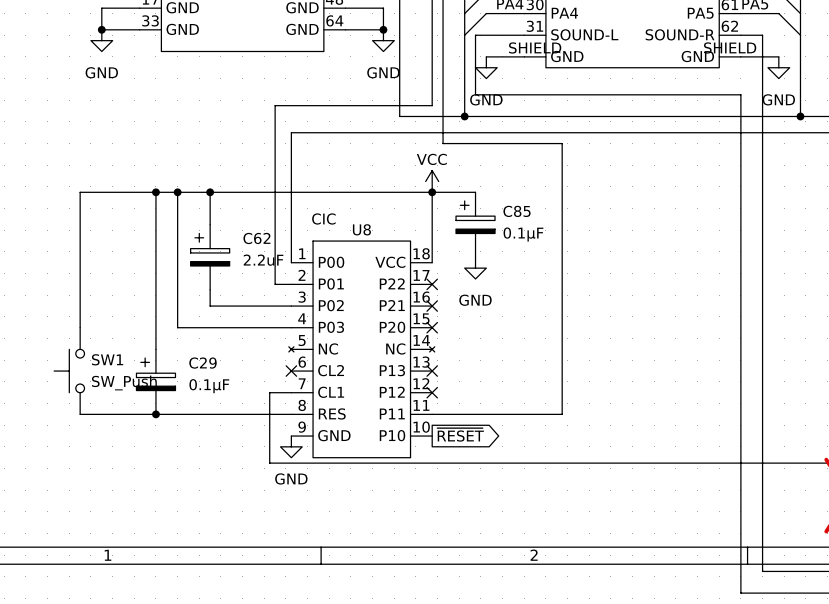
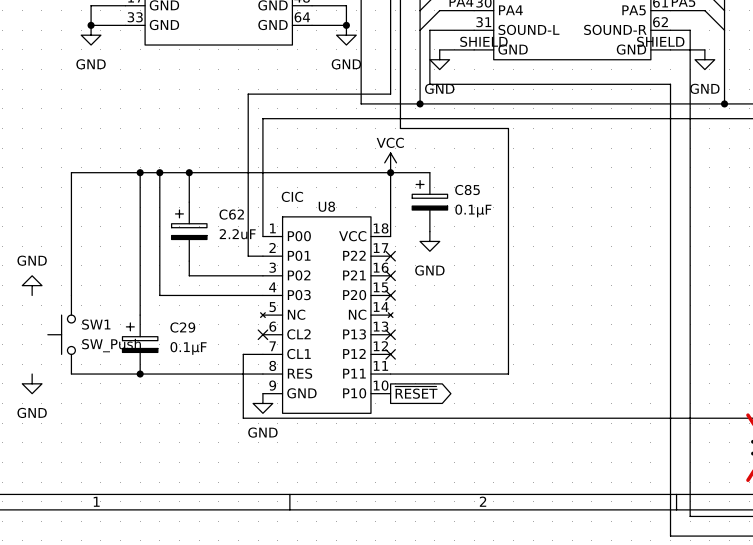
power symbol: none -> GND (32, 285)
power symbol: none -> GND (32, 383)

